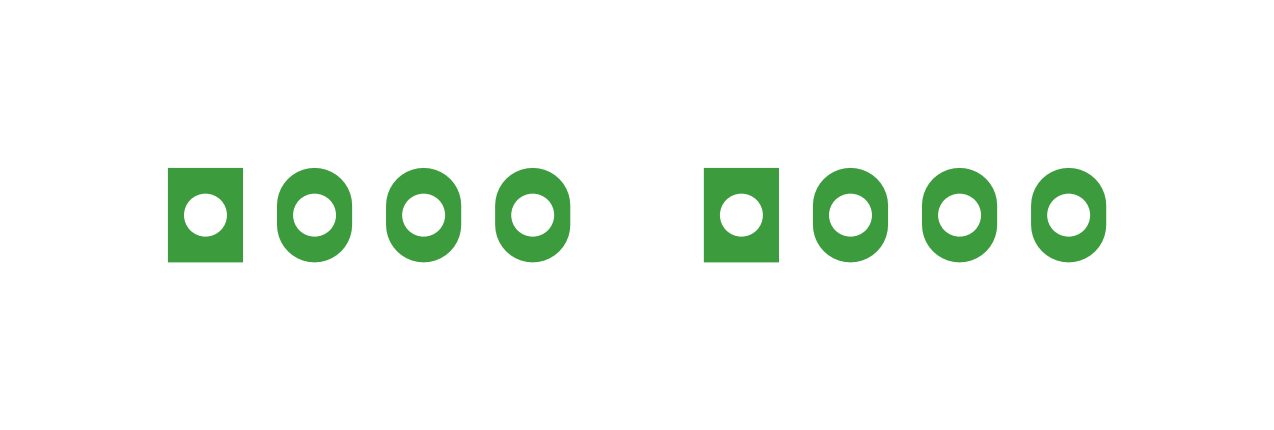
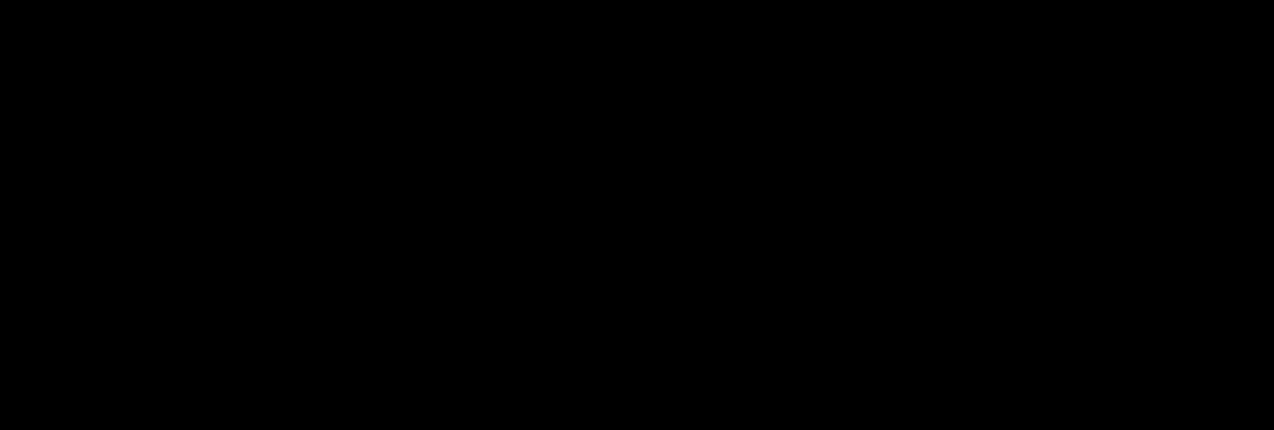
part: (369, 215) -> none
part: (905, 215) -> none

